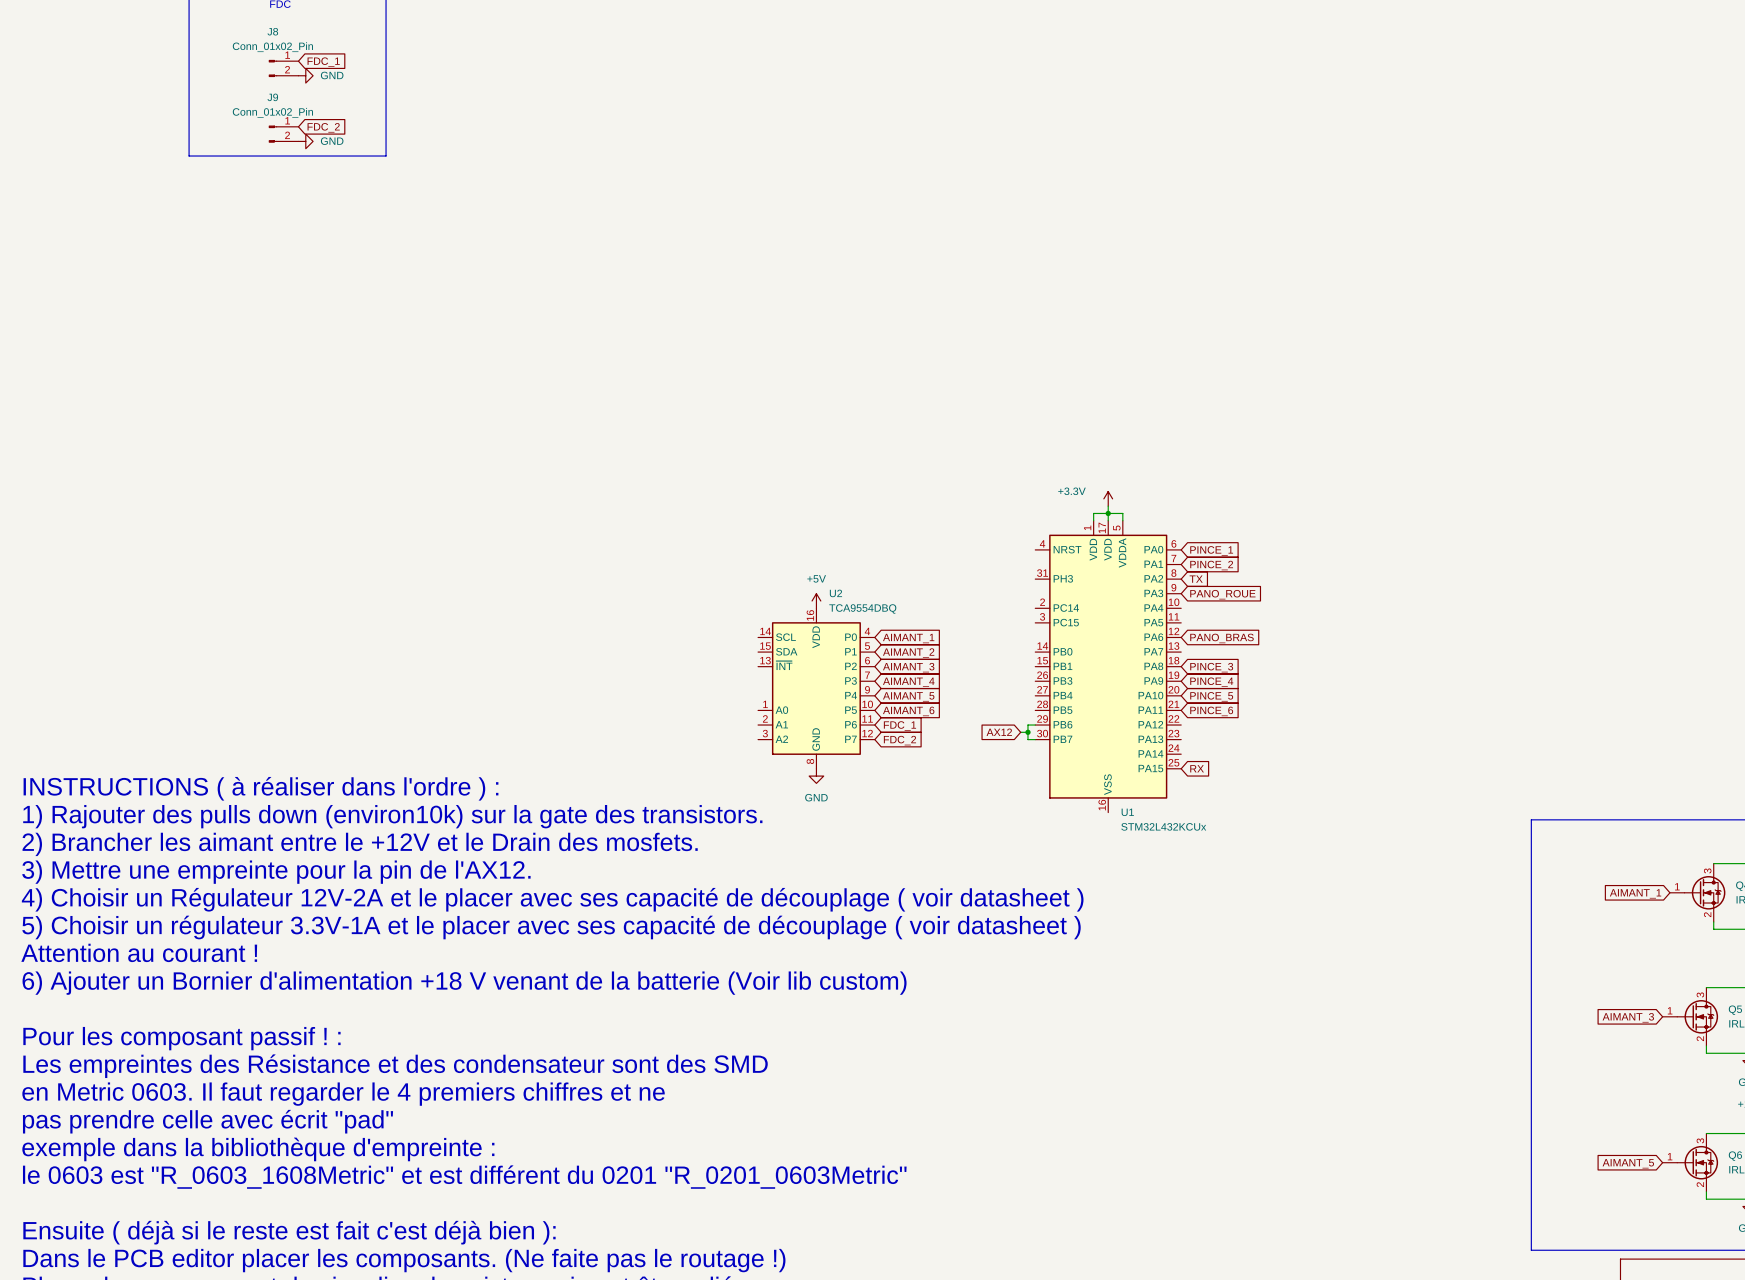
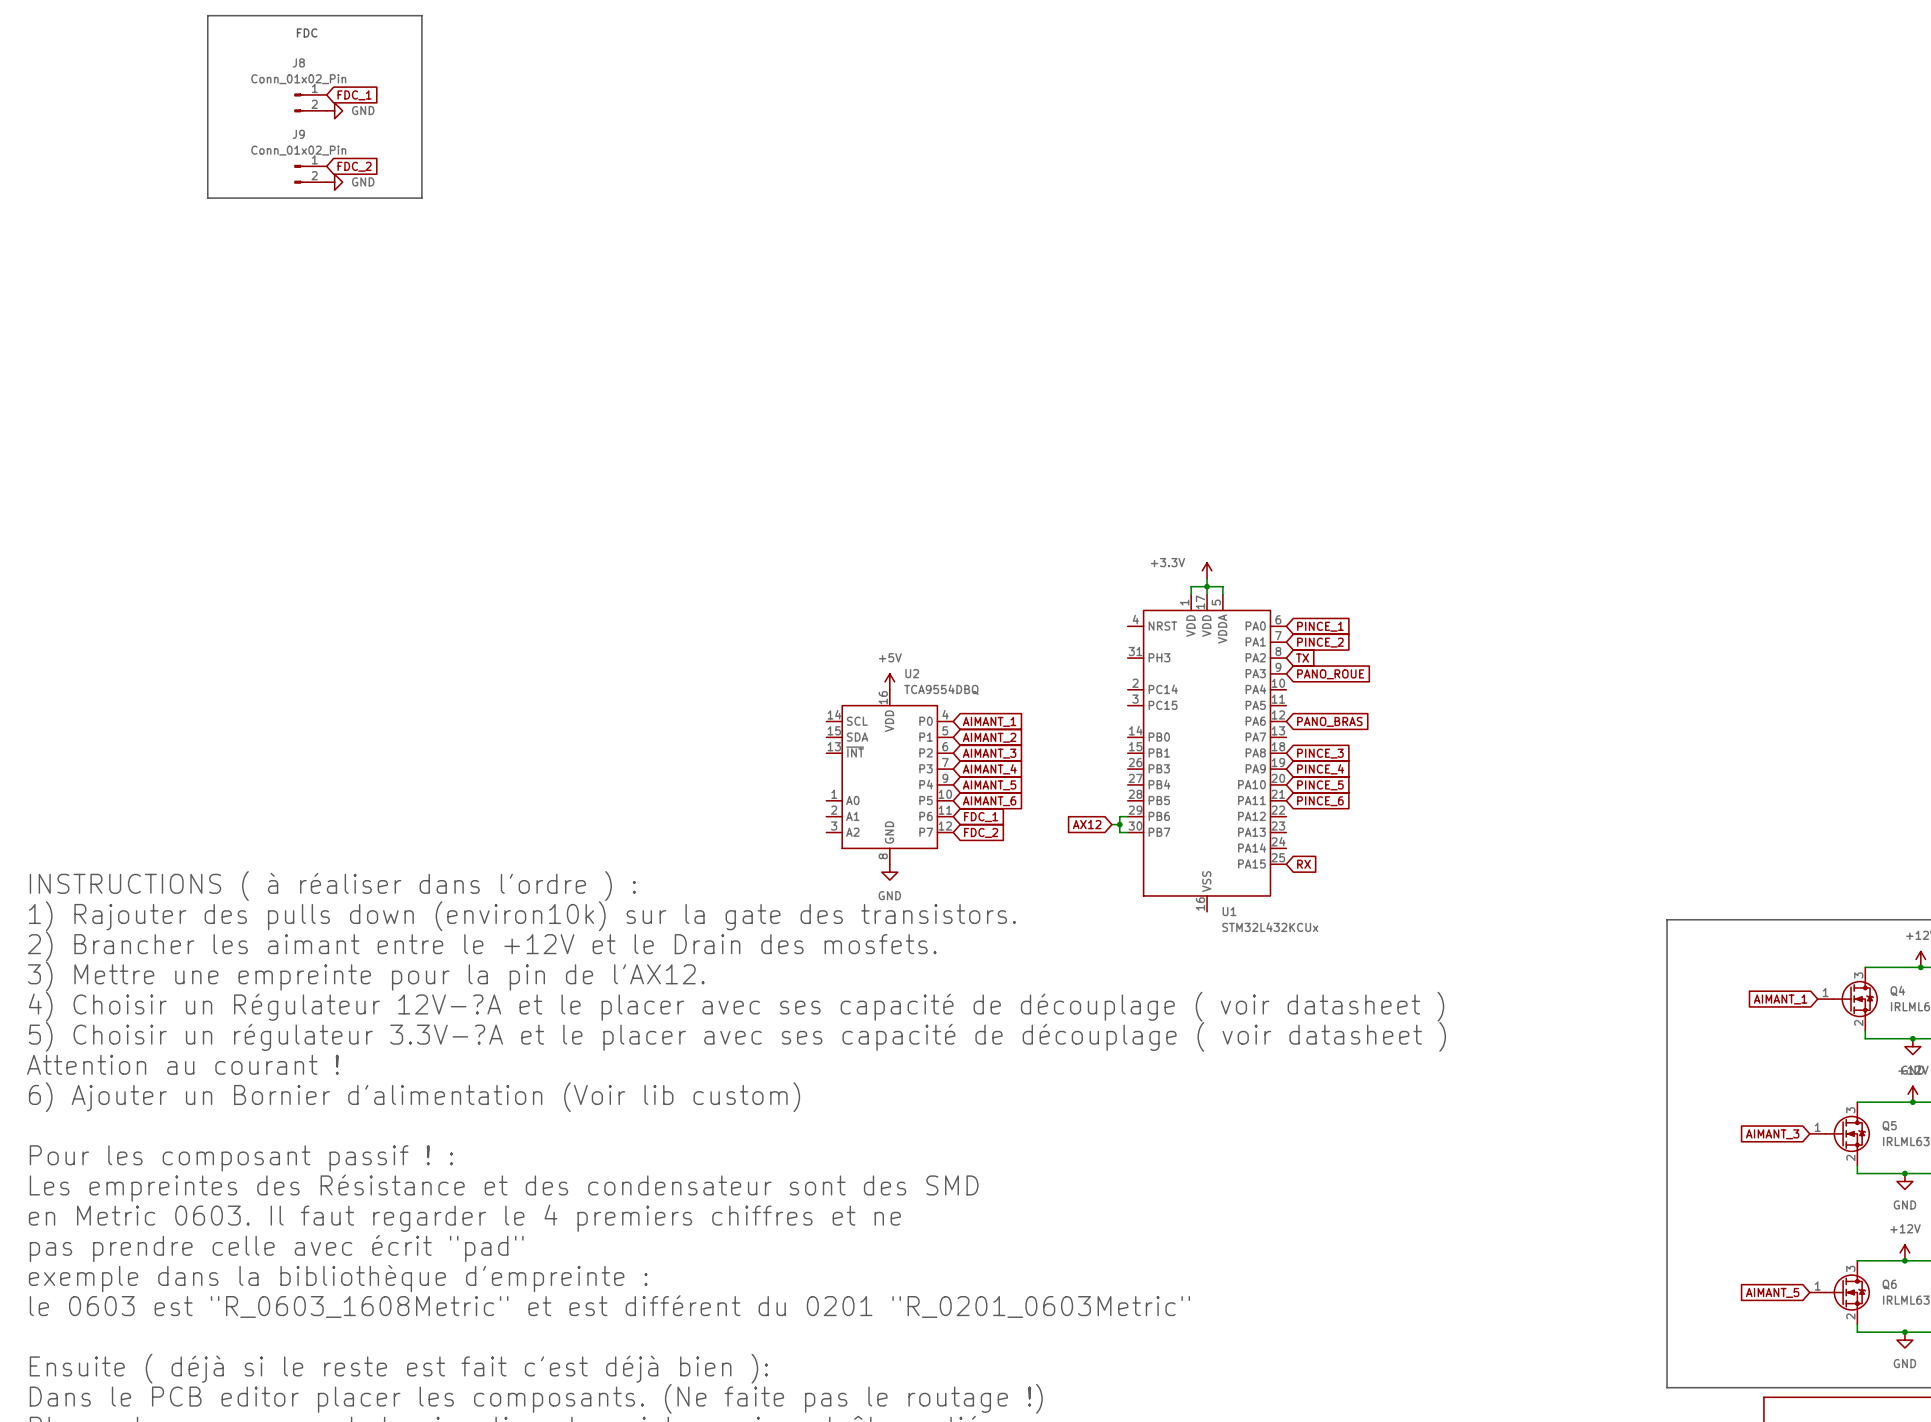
text: 4) Choisir un Régulateur 12V-2A et le placer avec ses capacité de découplage ( voir datasheet ) (552, 899) -> 4) Choisir un Régulateur 12V-?A et le placer avec ses capacité de découplage ( voir datasheet ) (736, 1006)
text: 5) Choisir un régulateur 3.3V-1A et le placer avec ses capacité de découplage ( voir datasheet ) (551, 927) -> 5) Choisir un régulateur 3.3V-?A et le placer avec ses capacité de découplage ( voir datasheet ) (737, 1036)
text: 6) Ajouter un Bornier d'alimentation +18 V venant de la batterie (Voir lib custom) (464, 983) -> 6) Ajouter un Bornier d'alimentation (Voir lib custom) (414, 1097)

